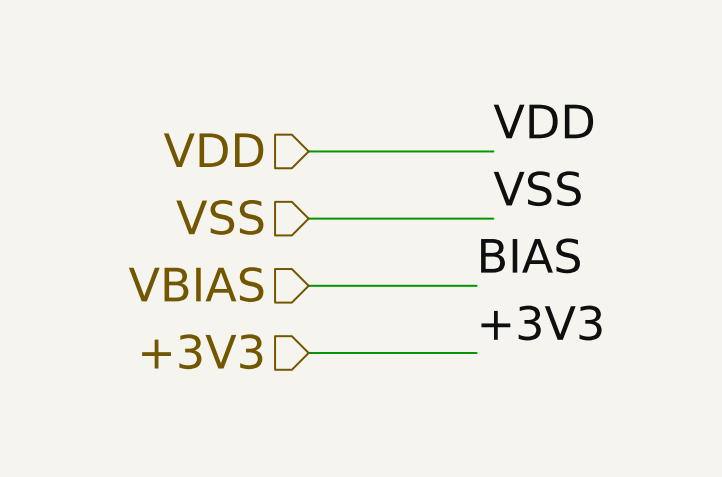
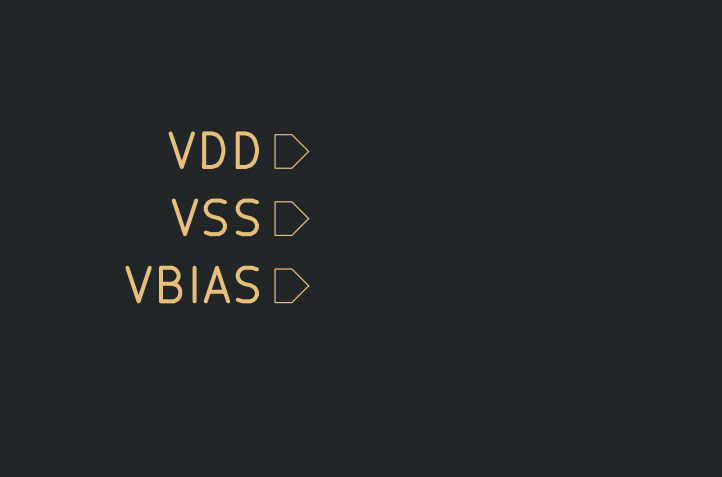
label: VDD (543, 121) -> none
wire: (308, 151) (493, 151) -> none
label: VSS (537, 188) -> none
wire: (308, 218) (493, 218) -> none
label: BIAS (530, 255) -> none
wire: (308, 285) (476, 285) -> none
label: +3V3 (541, 323) -> none
hierarchical label: +3V3 (202, 351) -> none
wire: (308, 352) (476, 352) -> none

